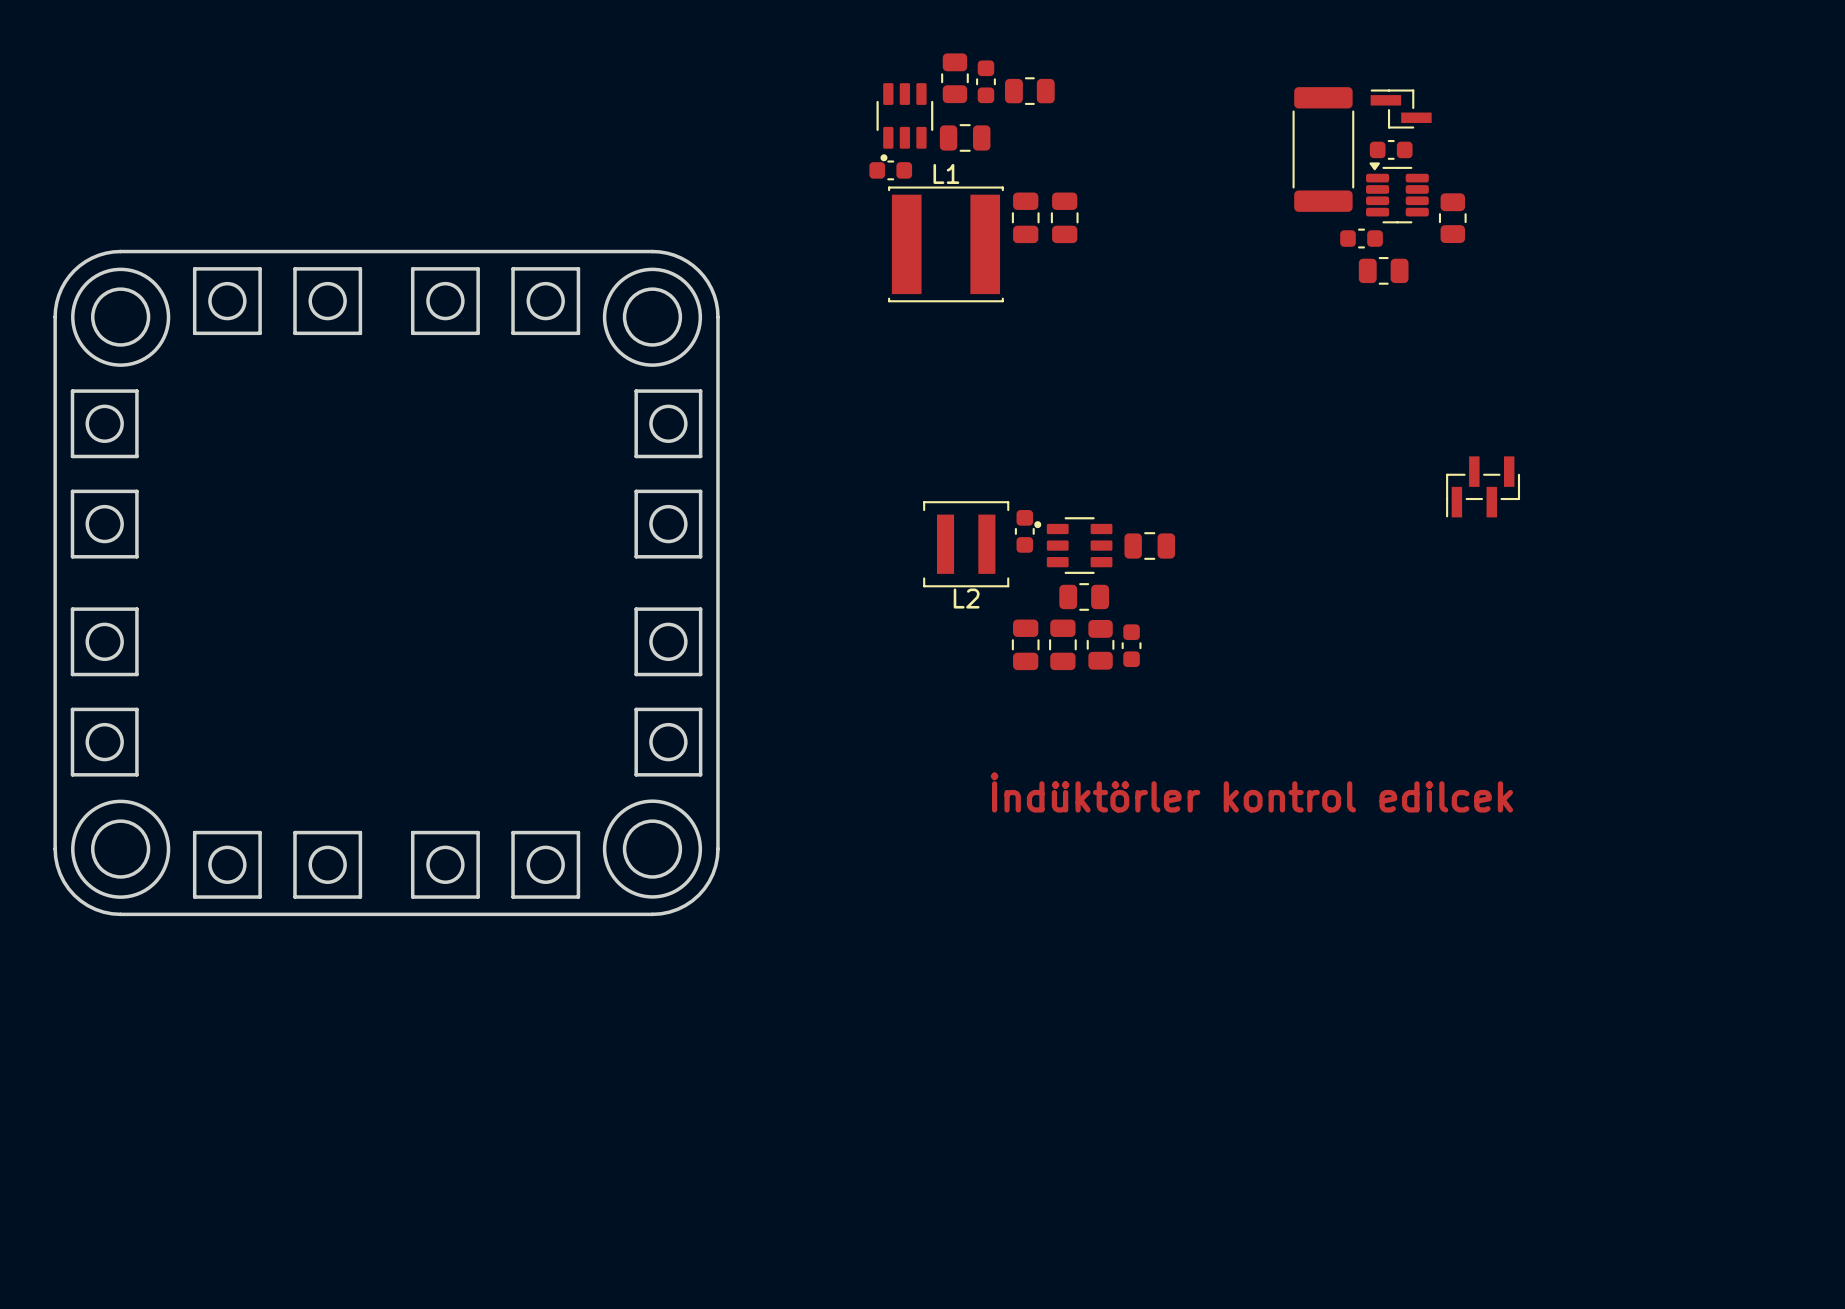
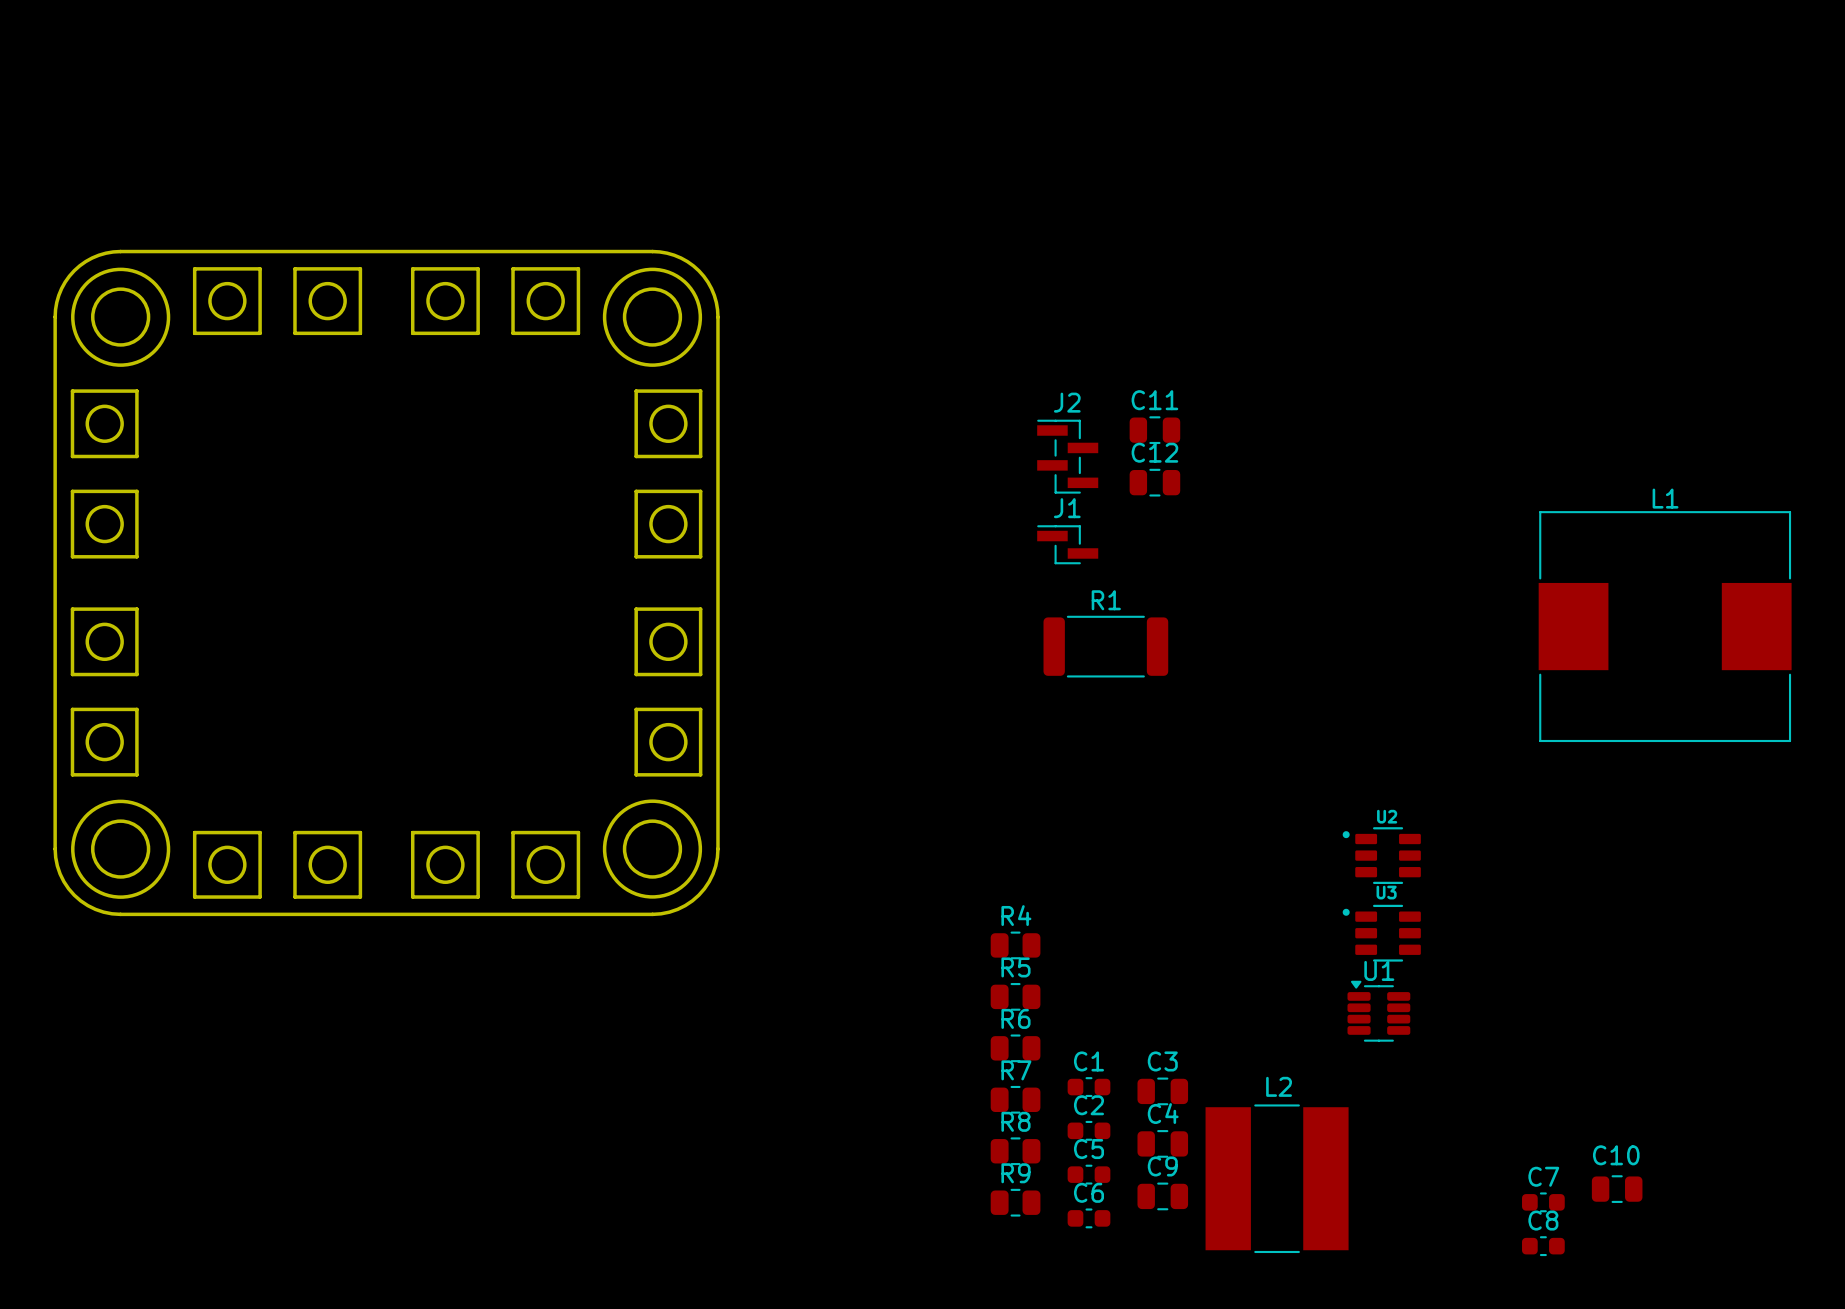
part: (954, 78) -> none
part: (985, 81) -> none
part: (1029, 91) -> none
part: (1401, 109) -> none
part: (904, 122) -> none
part: (965, 137) -> none
part: (1323, 149) -> none
part: (1391, 149) -> none
part: (890, 170) -> none
L1 name position: L1 (946, 173) -> L1 (1665, 498)
L1 footprint: [888, 186, 1004, 303] -> [1538, 511, 1792, 743]
part: (1397, 192) -> none
part: (1025, 217) -> none
part: (1064, 217) -> none
part: (1452, 218) -> none
part: (1361, 238) -> none
part: (1383, 270) -> none
C11: none -> (1154, 430)
J2: none -> (1067, 456)
C12: none -> (1154, 482)
part: (1483, 486) -> none
L2 footprint: [923, 501, 1010, 588] -> [1205, 1104, 1349, 1254]
part: (1024, 531) -> none
J1: none -> (1067, 544)
part: (1073, 545) -> none
part: (1149, 546) -> none
part: (1084, 596) -> none
L2 name position: L2 (966, 598) -> L2 (1279, 1086)
part: (1025, 644) -> none
part: (1062, 644) -> none
part: (1100, 644) -> none
part: (1131, 645) -> none
R1: none -> (1105, 646)
text: İndüktörler kontrol edilcek (1251, 792) -> none
U2: none -> (1381, 855)
U3: none -> (1381, 933)
R4: none -> (1015, 945)
R5: none -> (1015, 996)
U1: none -> (1378, 1011)
R6: none -> (1015, 1048)
C1: none -> (1088, 1087)
C3: none -> (1162, 1091)
R7: none -> (1015, 1099)
C2: none -> (1088, 1130)
C4: none -> (1162, 1143)
R8: none -> (1015, 1151)
C5: none -> (1088, 1174)
C10: none -> (1617, 1189)
C9: none -> (1162, 1196)
R9: none -> (1015, 1202)
C7: none -> (1543, 1202)
C6: none -> (1088, 1218)
C8: none -> (1543, 1246)

